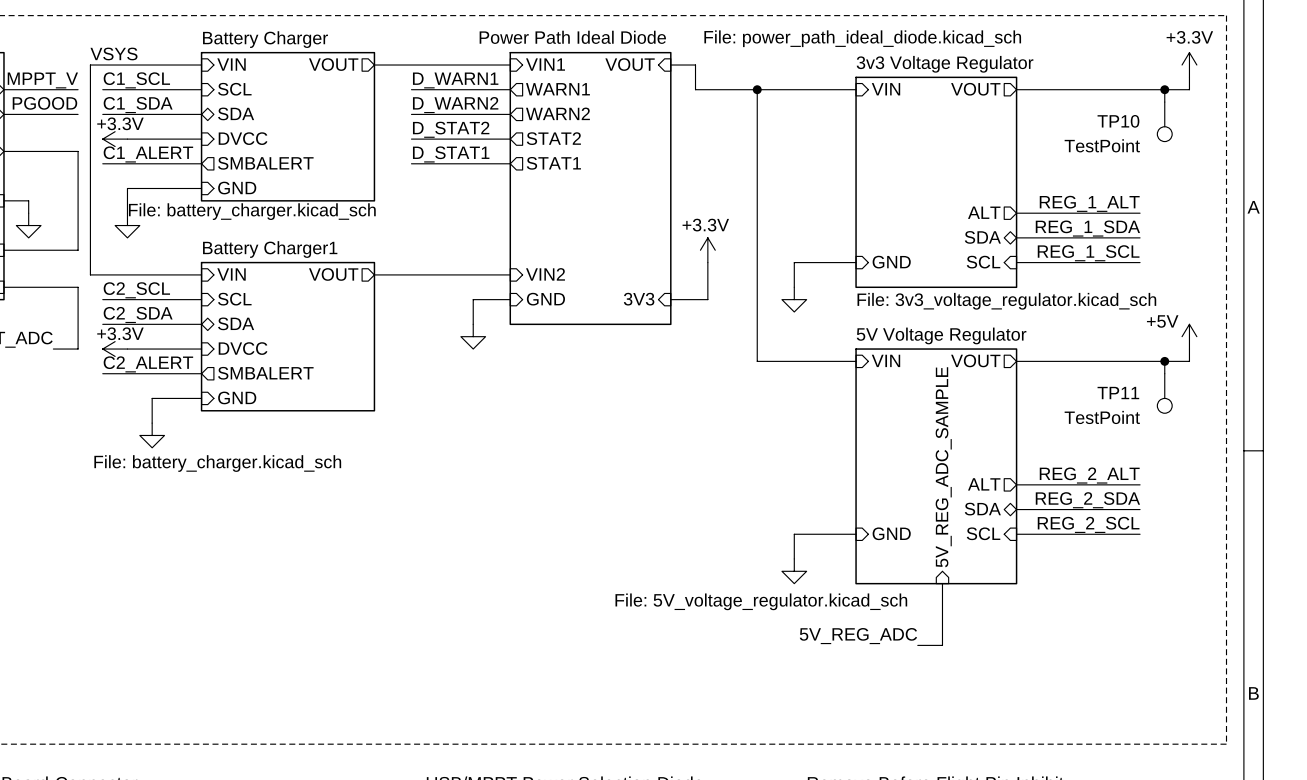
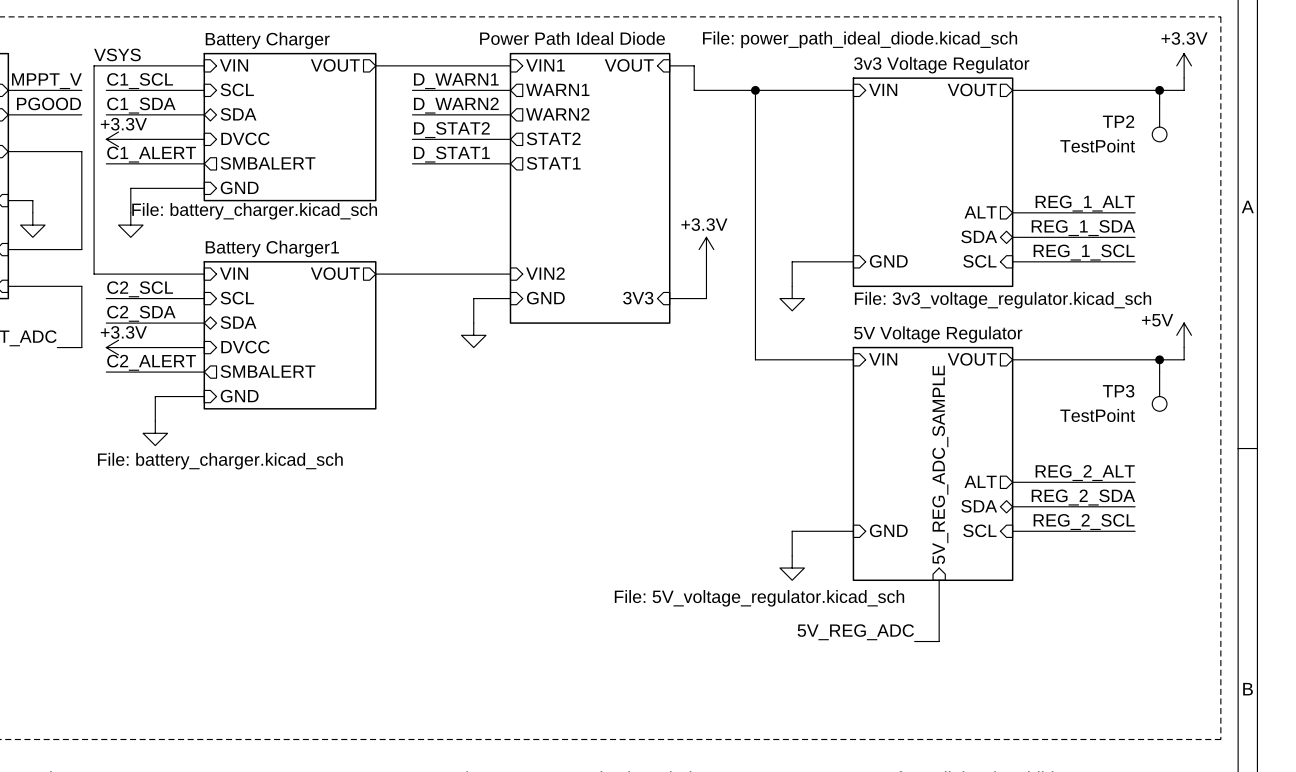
TP10 name: TP10 (1118, 121) -> TP2 (1118, 121)
TP11 name: TP11 (1118, 393) -> TP3 (1118, 391)

